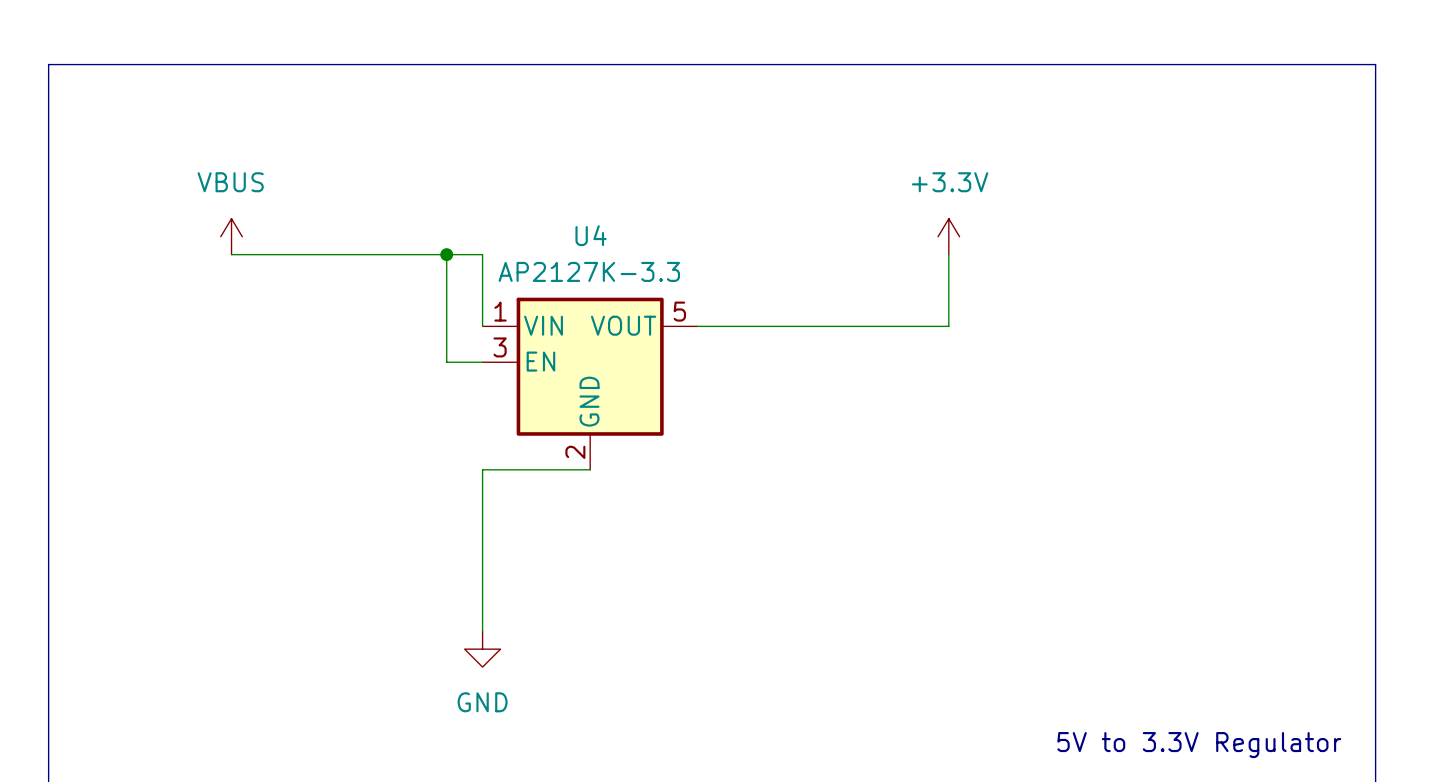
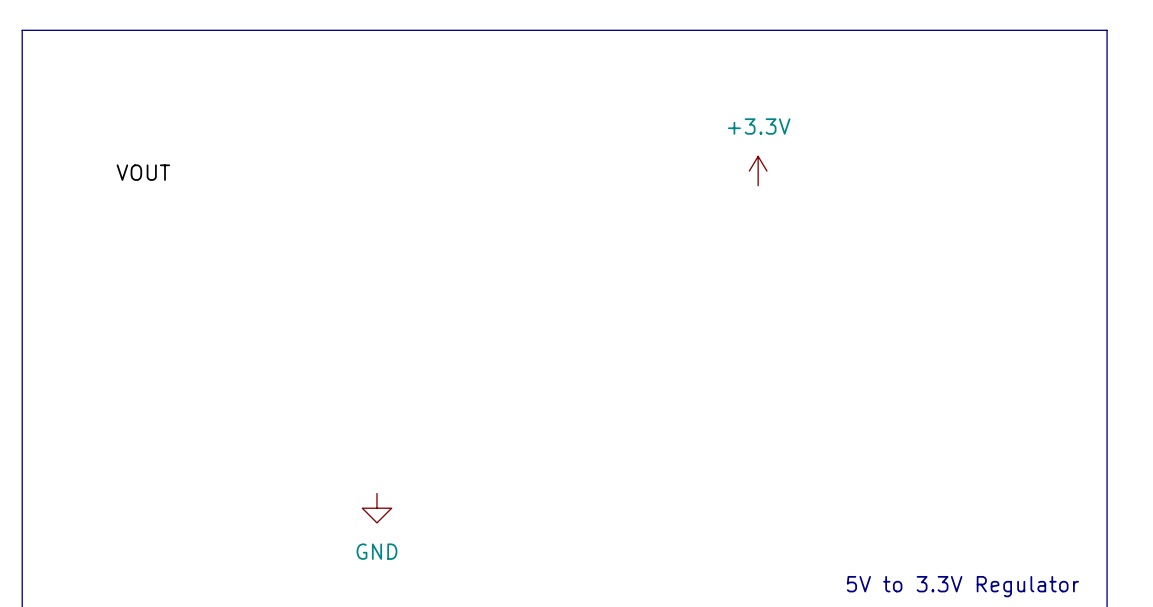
power symbol: VBUS (231, 236) -> none
label: none -> VOUT (143, 172)
wire: (231, 254) (482, 254) (482, 326) -> none
wire: (446, 254) (446, 362) (482, 362) -> none
junction: (446, 254) -> none
wire: (948, 254) (948, 326) (697, 326) -> none
U4: AP2127K-3.3 (590, 383) -> none
wire: (590, 469) (482, 469) (482, 631) -> none

